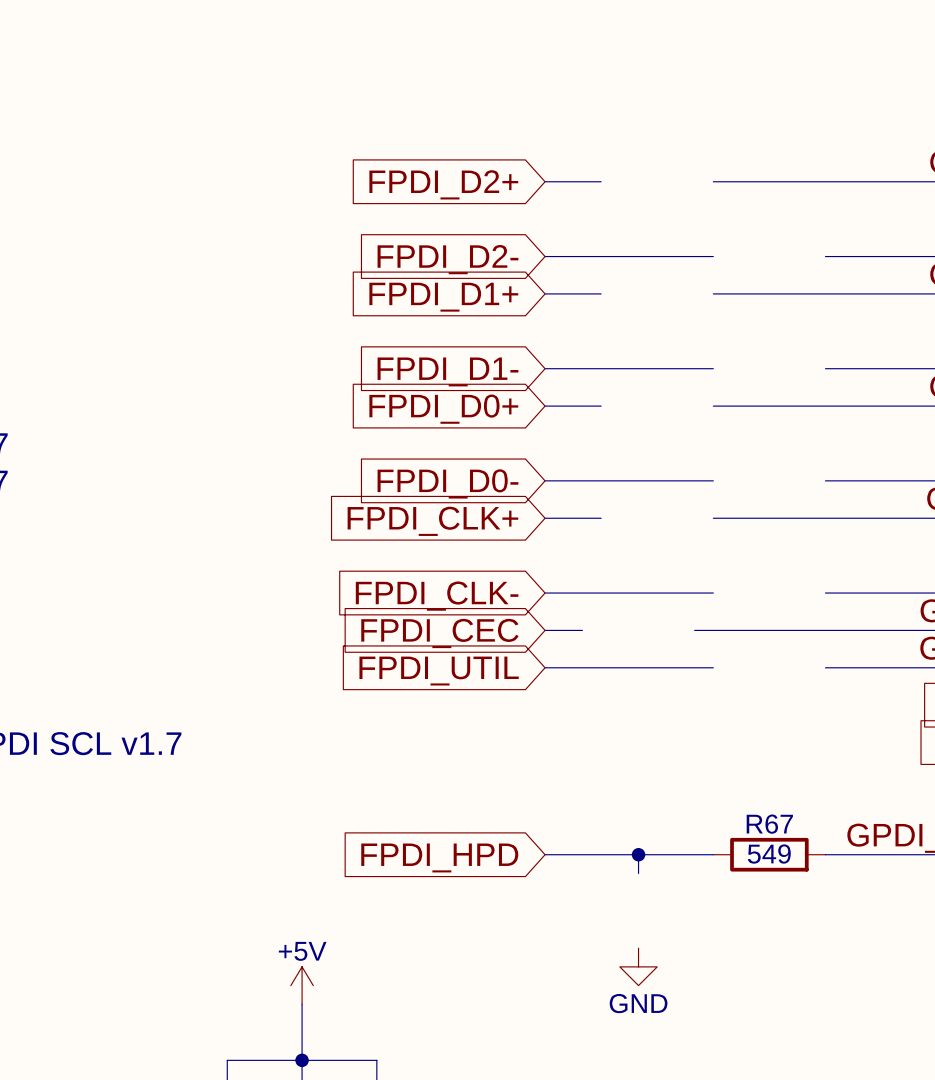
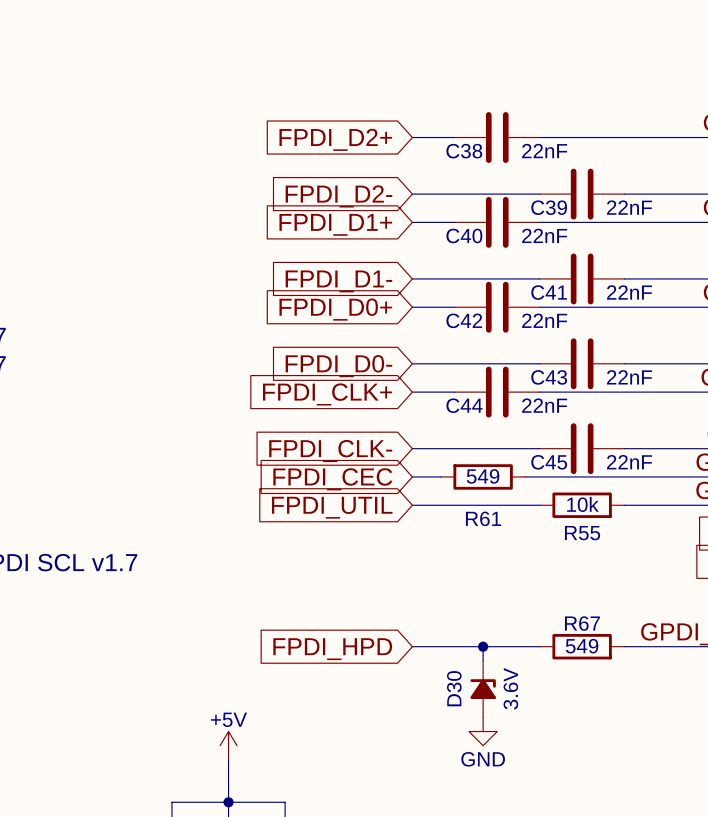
C38: none -> 22nF (497, 137)
C39: none -> 22nF (582, 194)
C40: none -> 22nF (497, 222)
C41: none -> 22nF (582, 278)
C42: none -> 22nF (497, 307)
C43: none -> 22nF (582, 363)
C44: none -> 22nF (497, 392)
C45: none -> 22nF (582, 448)
R61: none -> 549 (483, 476)
R55: none -> 10k (582, 505)
D30: none -> 3.6V (483, 689)

